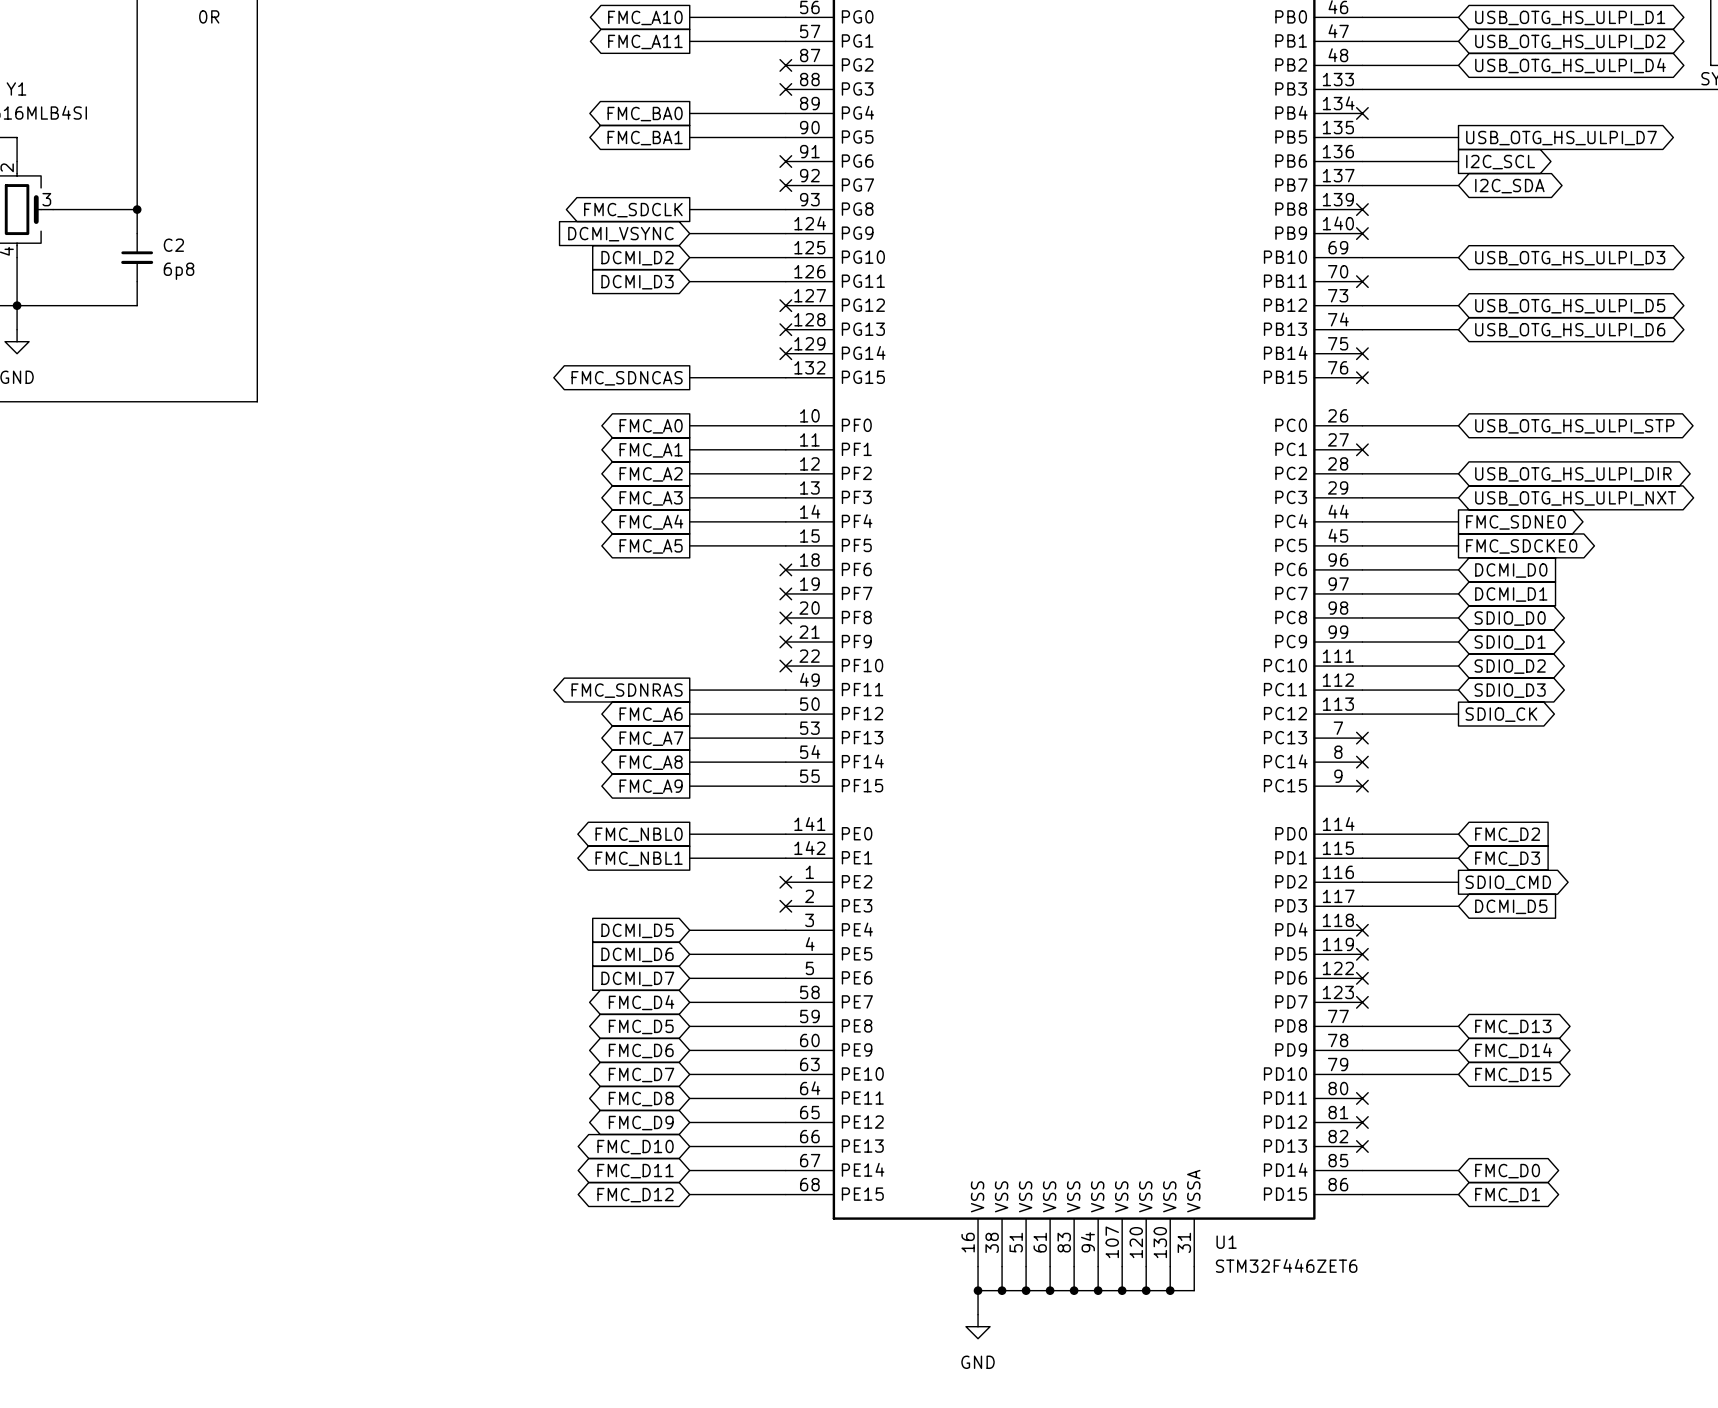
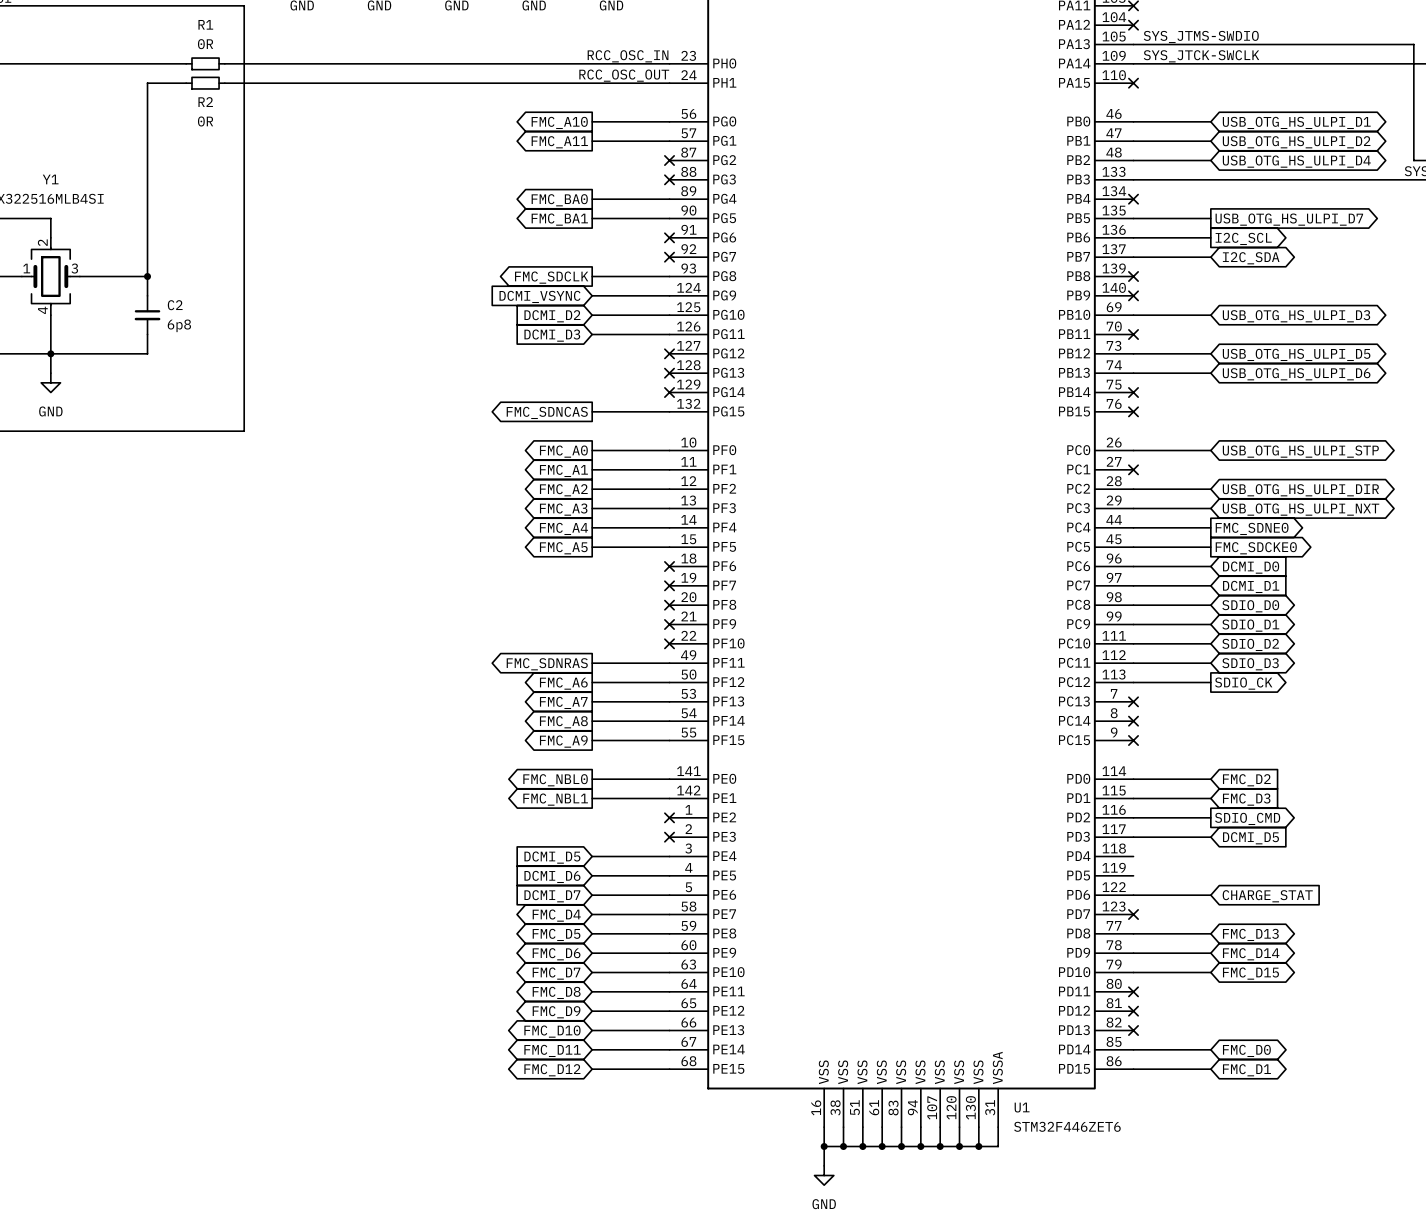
no-connect mark: (1362, 930) -> none
no-connect mark: (1362, 954) -> none
wire: none -> (1133, 895) (1210, 895)
no-connect mark: (1362, 978) -> none
global label: none -> CHARGE_STAT (1267, 896)

